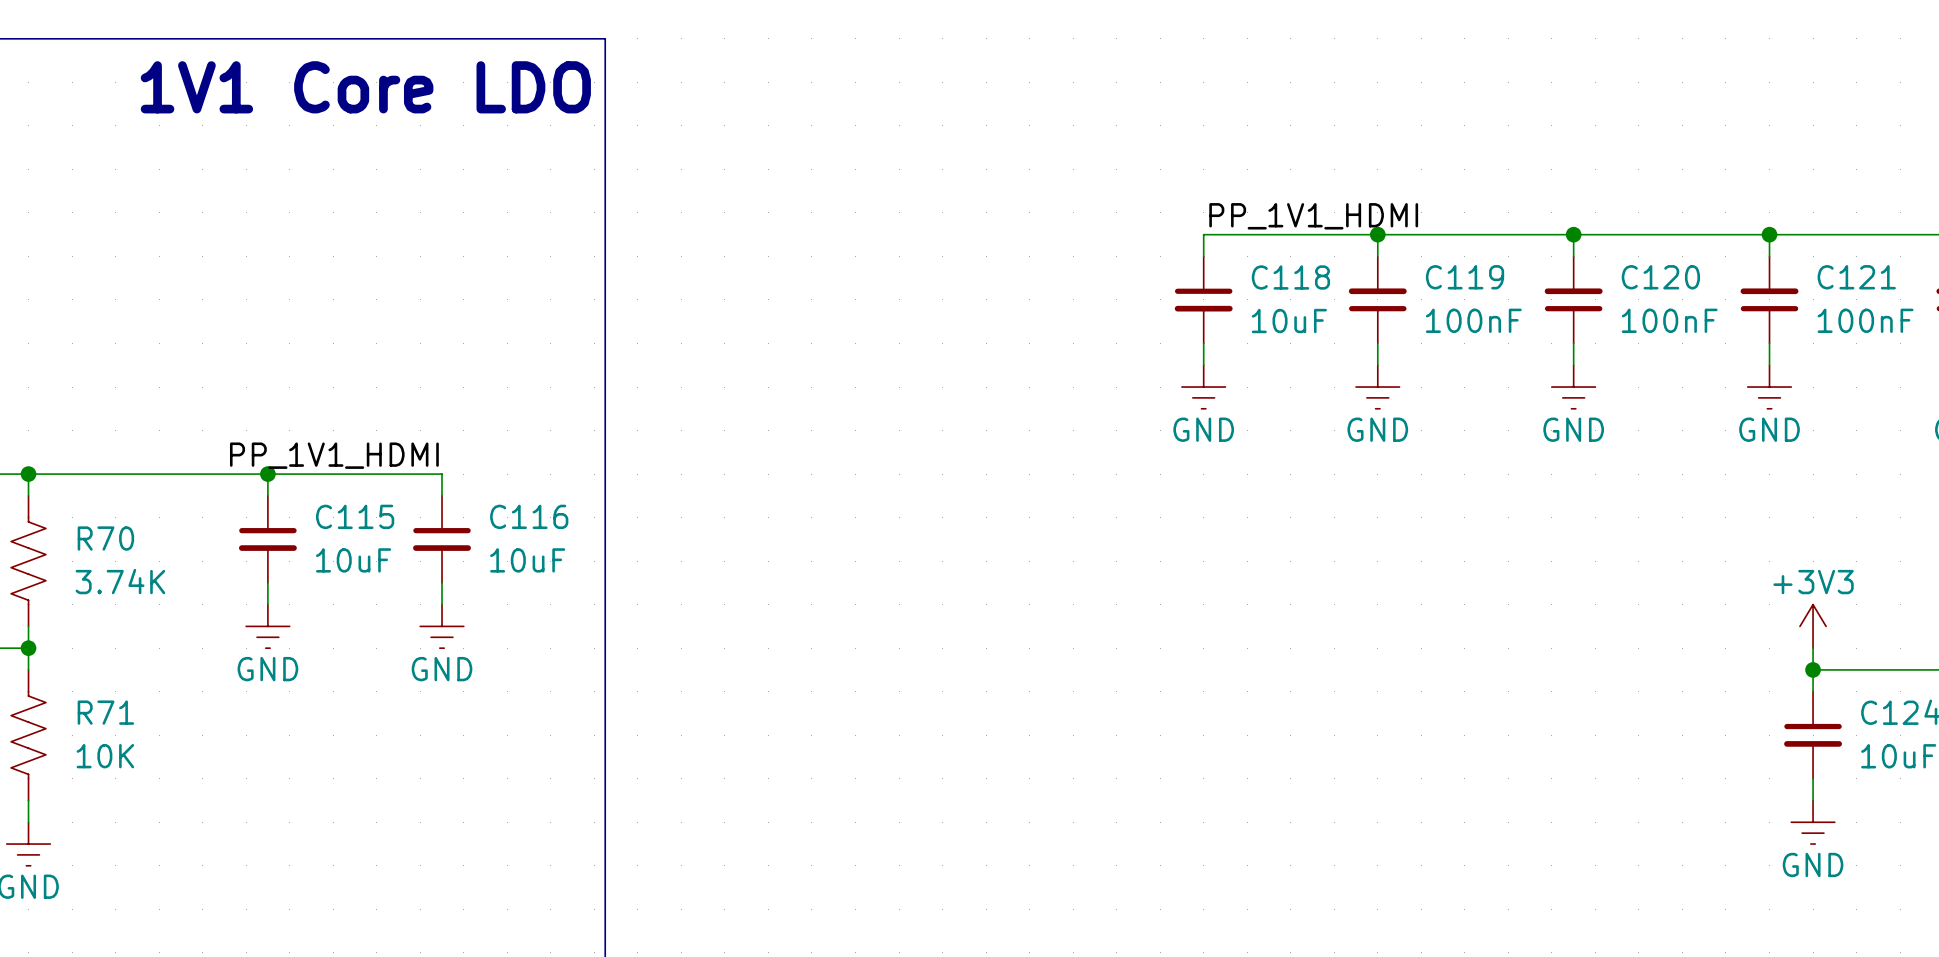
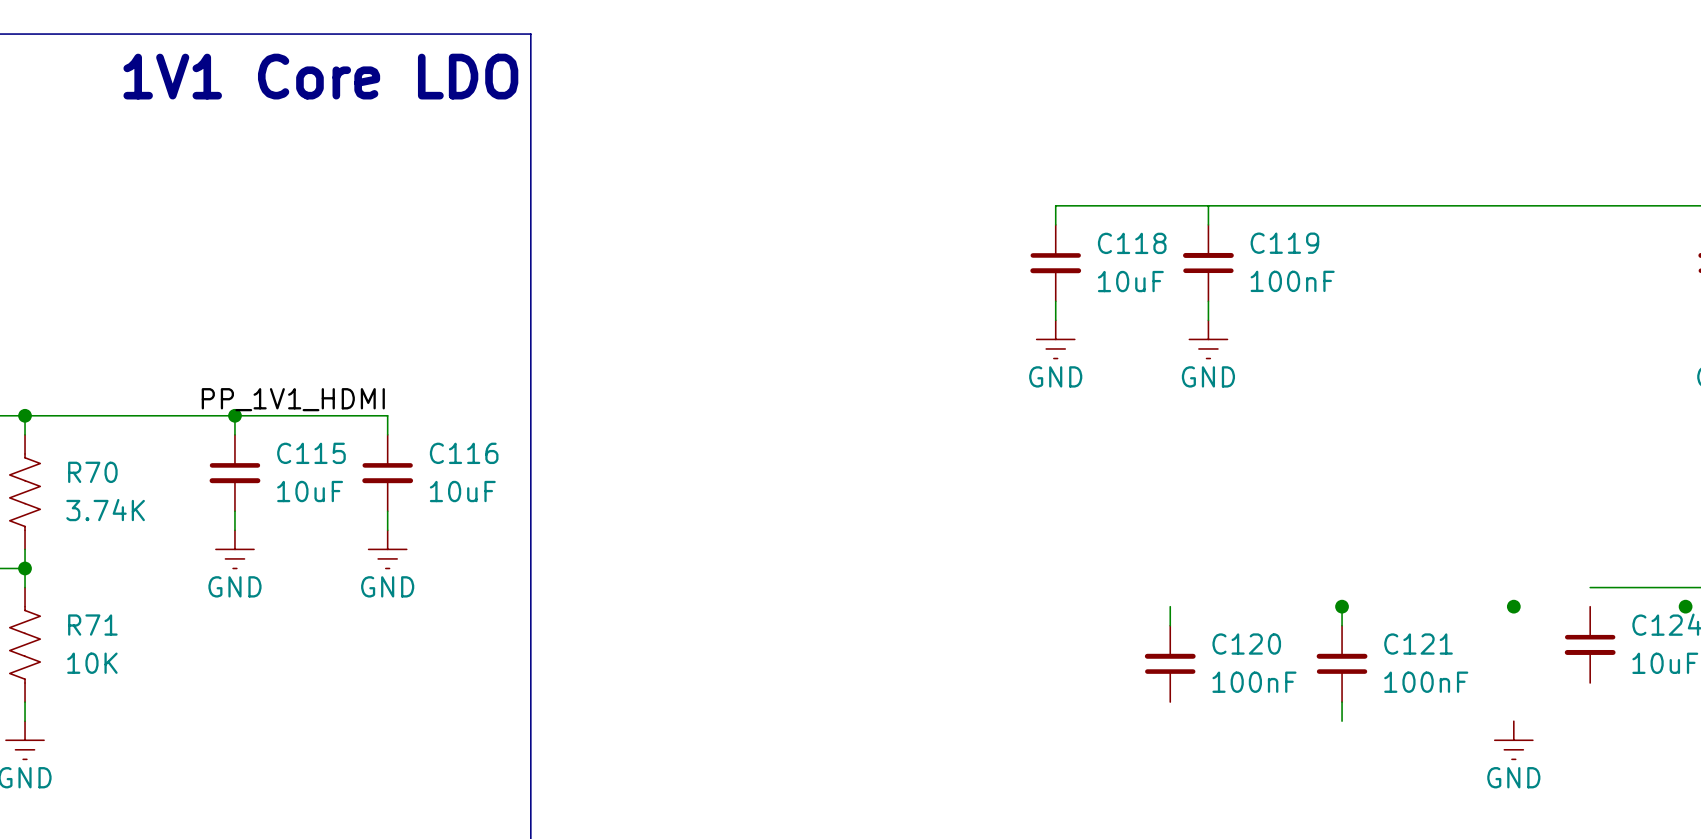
label: PP_1V1_HDMI (1313, 216) -> none
junction: (1377, 234) -> none
wire: (1573, 234) (1573, 256) -> none
junction: (1573, 234) -> none
wire: (1769, 234) (1769, 256) -> none
junction: (1769, 234) -> none
C120 position: (1573, 299) -> (1170, 663)
C121 position: (1769, 299) -> (1342, 663)
wire: (1573, 343) (1573, 365) -> (1170, 606) (1170, 625)
wire: (1769, 343) (1769, 365) -> (1342, 606) (1342, 625)
power symbol: GND (1573, 387) -> none
power symbol: GND (1769, 387) -> none
power symbol: +3V3 (1813, 626) -> none
wire: (1813, 648) (1813, 691) -> none
junction: (1813, 669) -> none
junction: none -> (1342, 606)
junction: none -> (1513, 606)
junction: none -> (1685, 606)
wire: (1813, 778) (1813, 800) -> (1342, 702) (1342, 721)
power symbol position: GND (1813, 822) -> GND (1513, 740)

